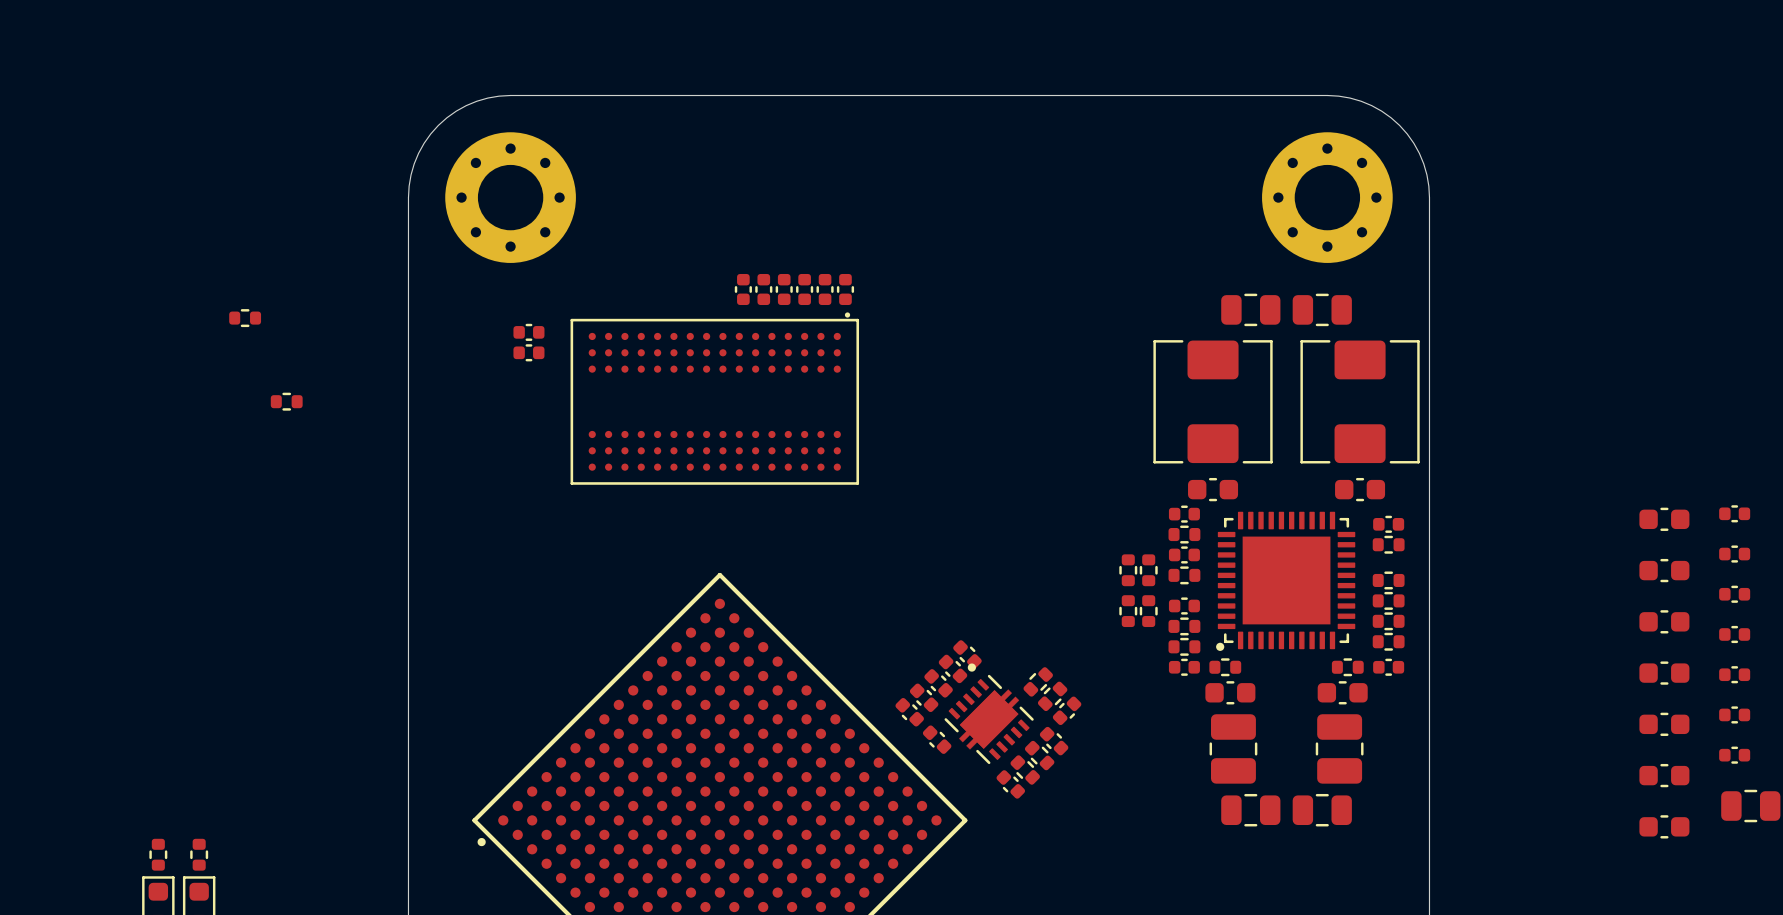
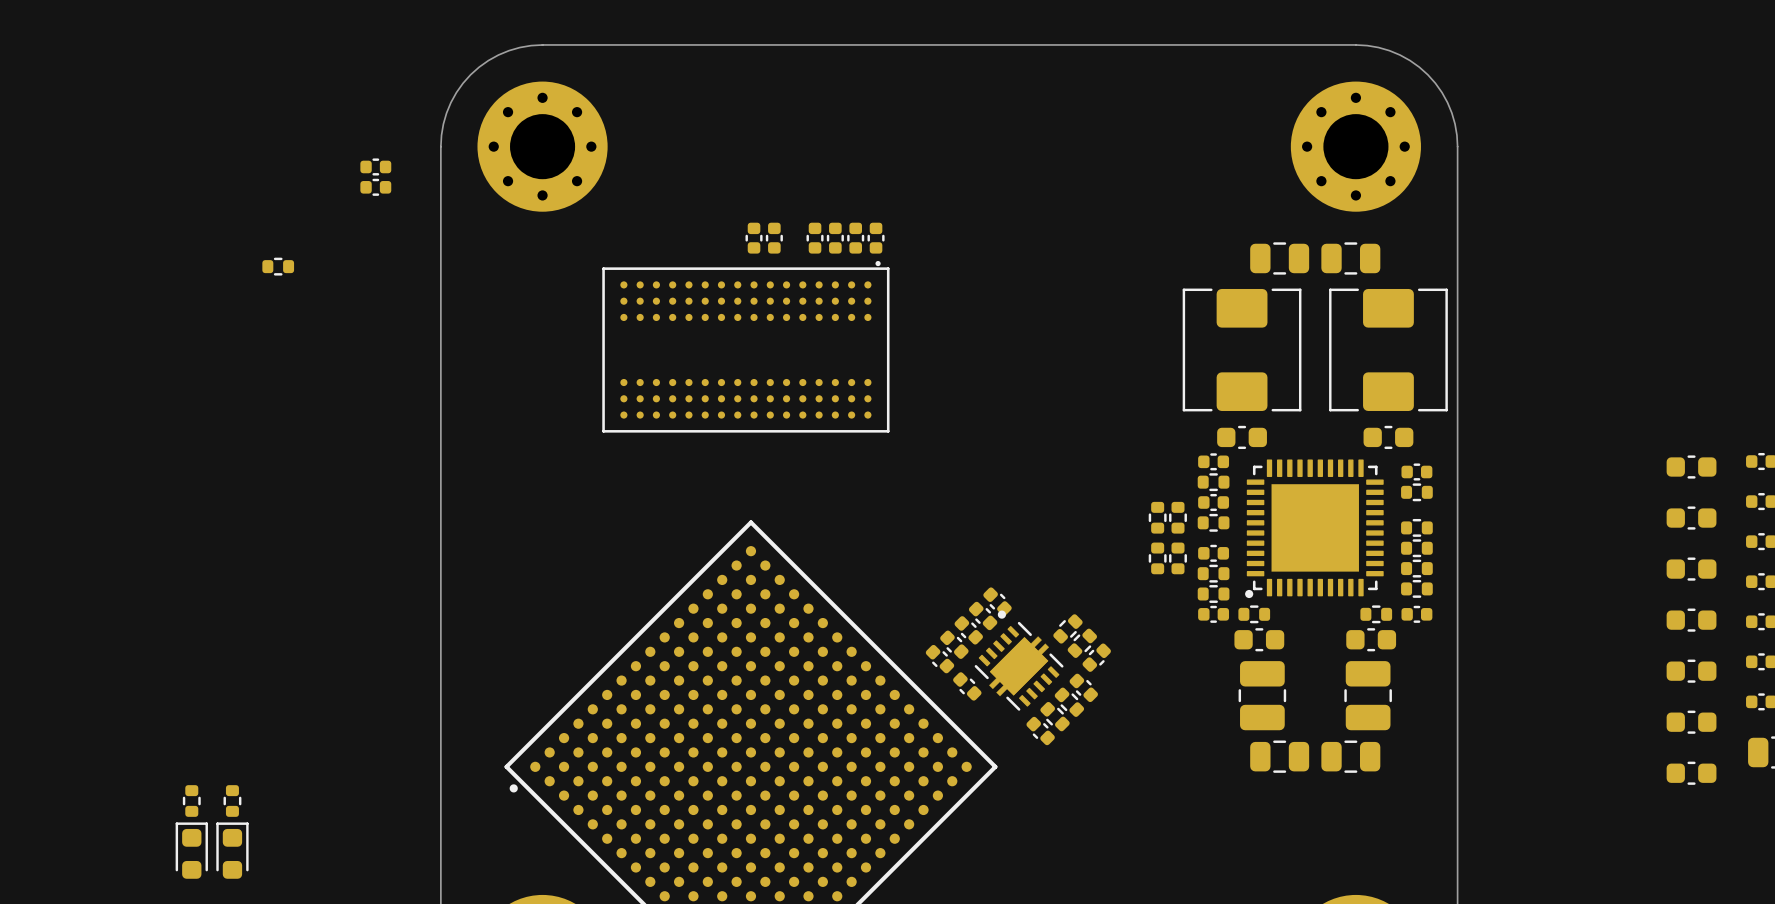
part: none -> (375, 166)
part: none -> (375, 187)
part position: (763, 289) -> (754, 238)
part: (528, 332) -> none
part: (528, 352) -> none
part: (286, 401) -> none

